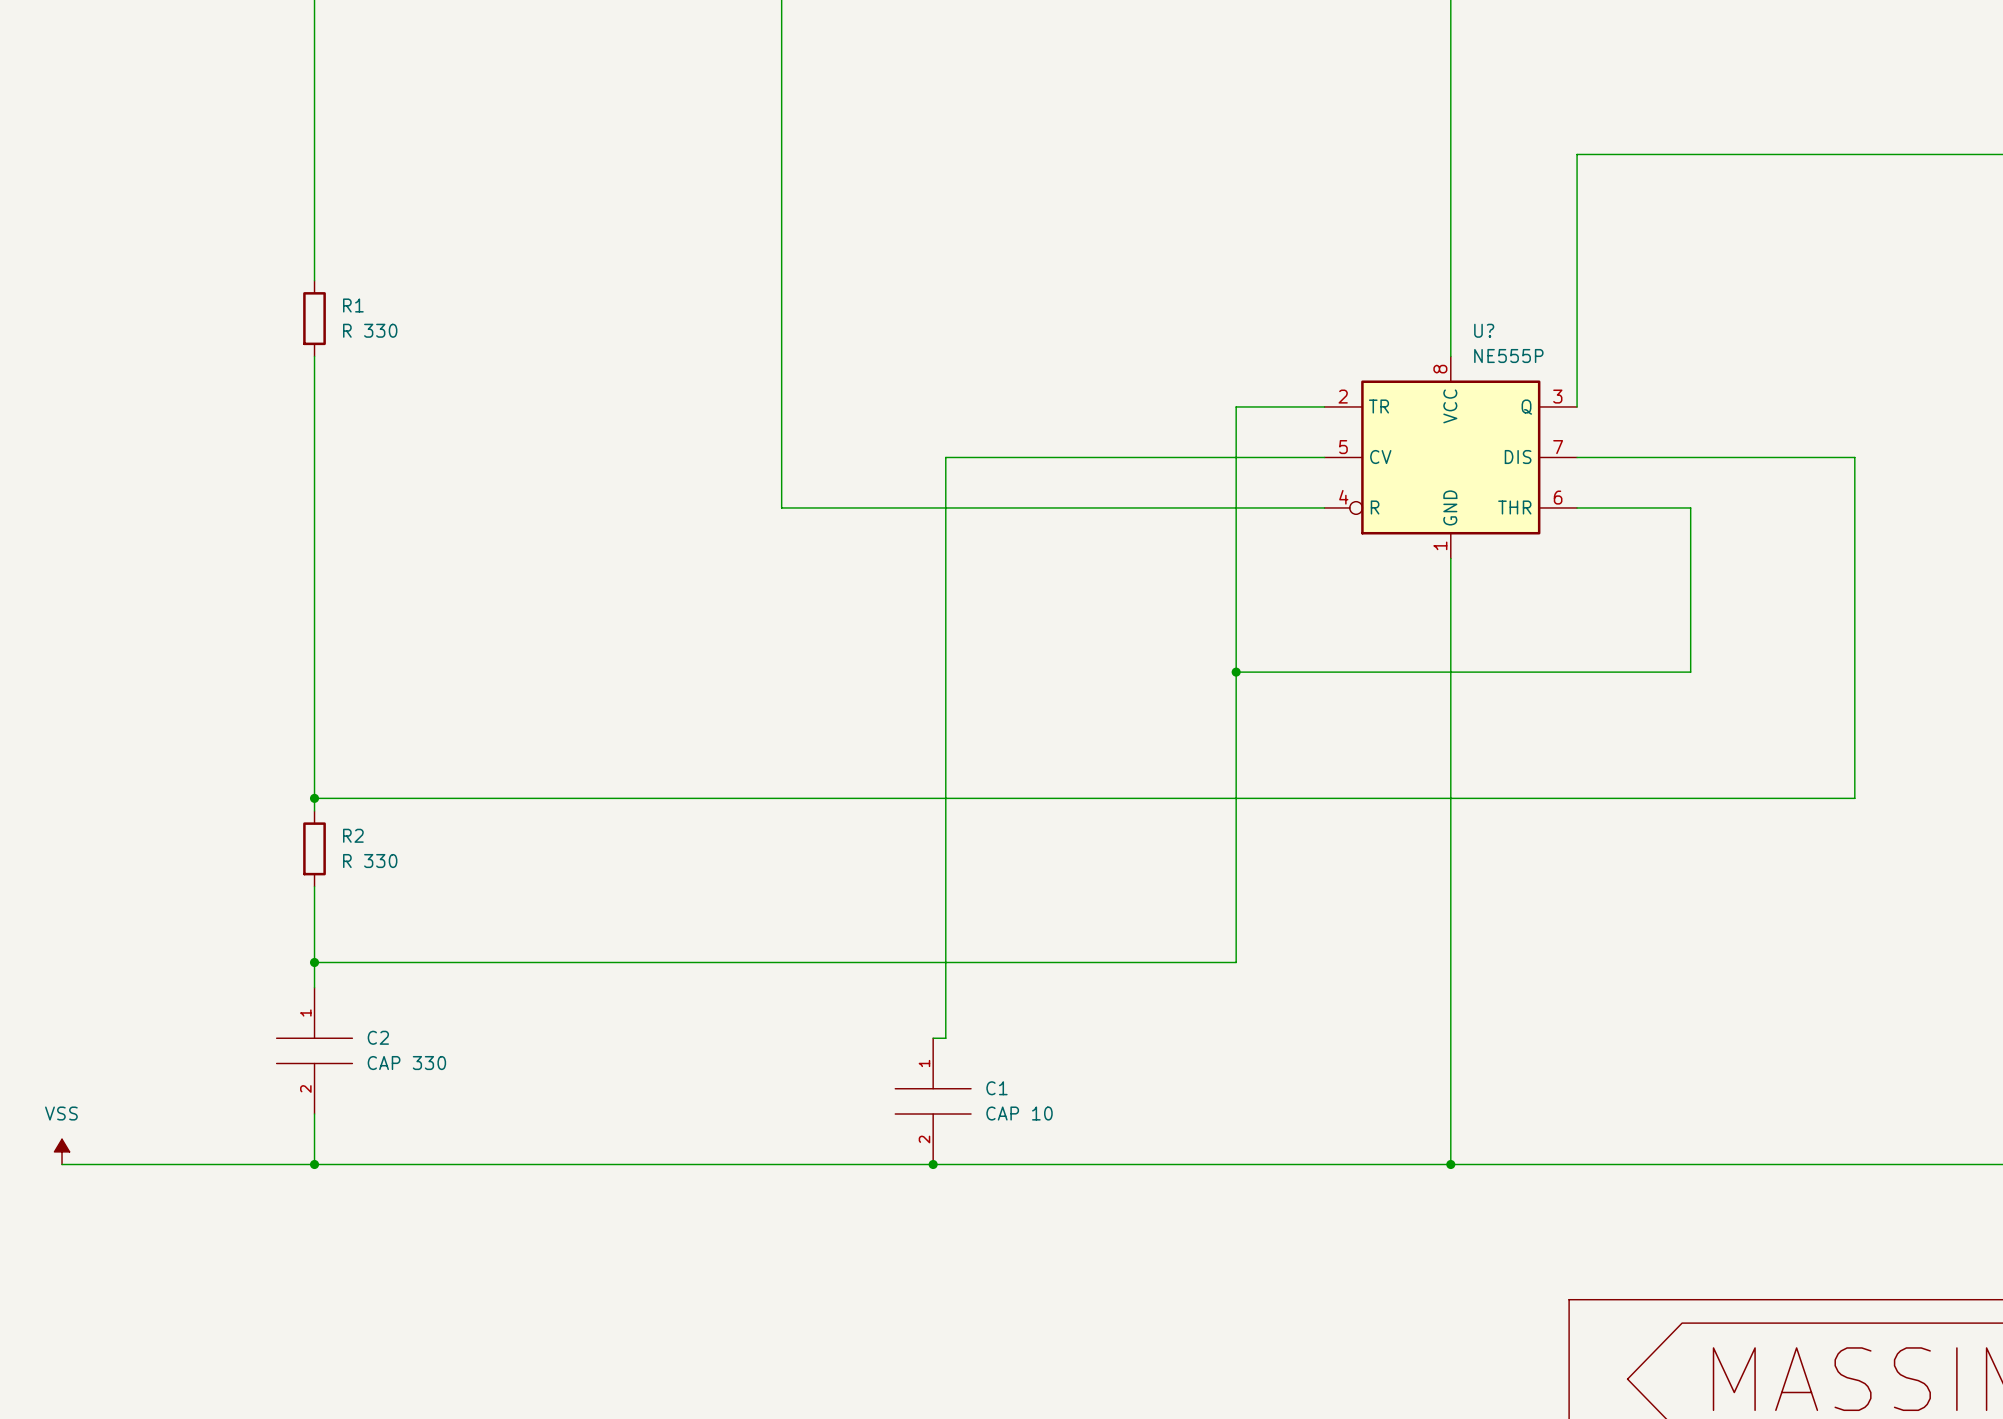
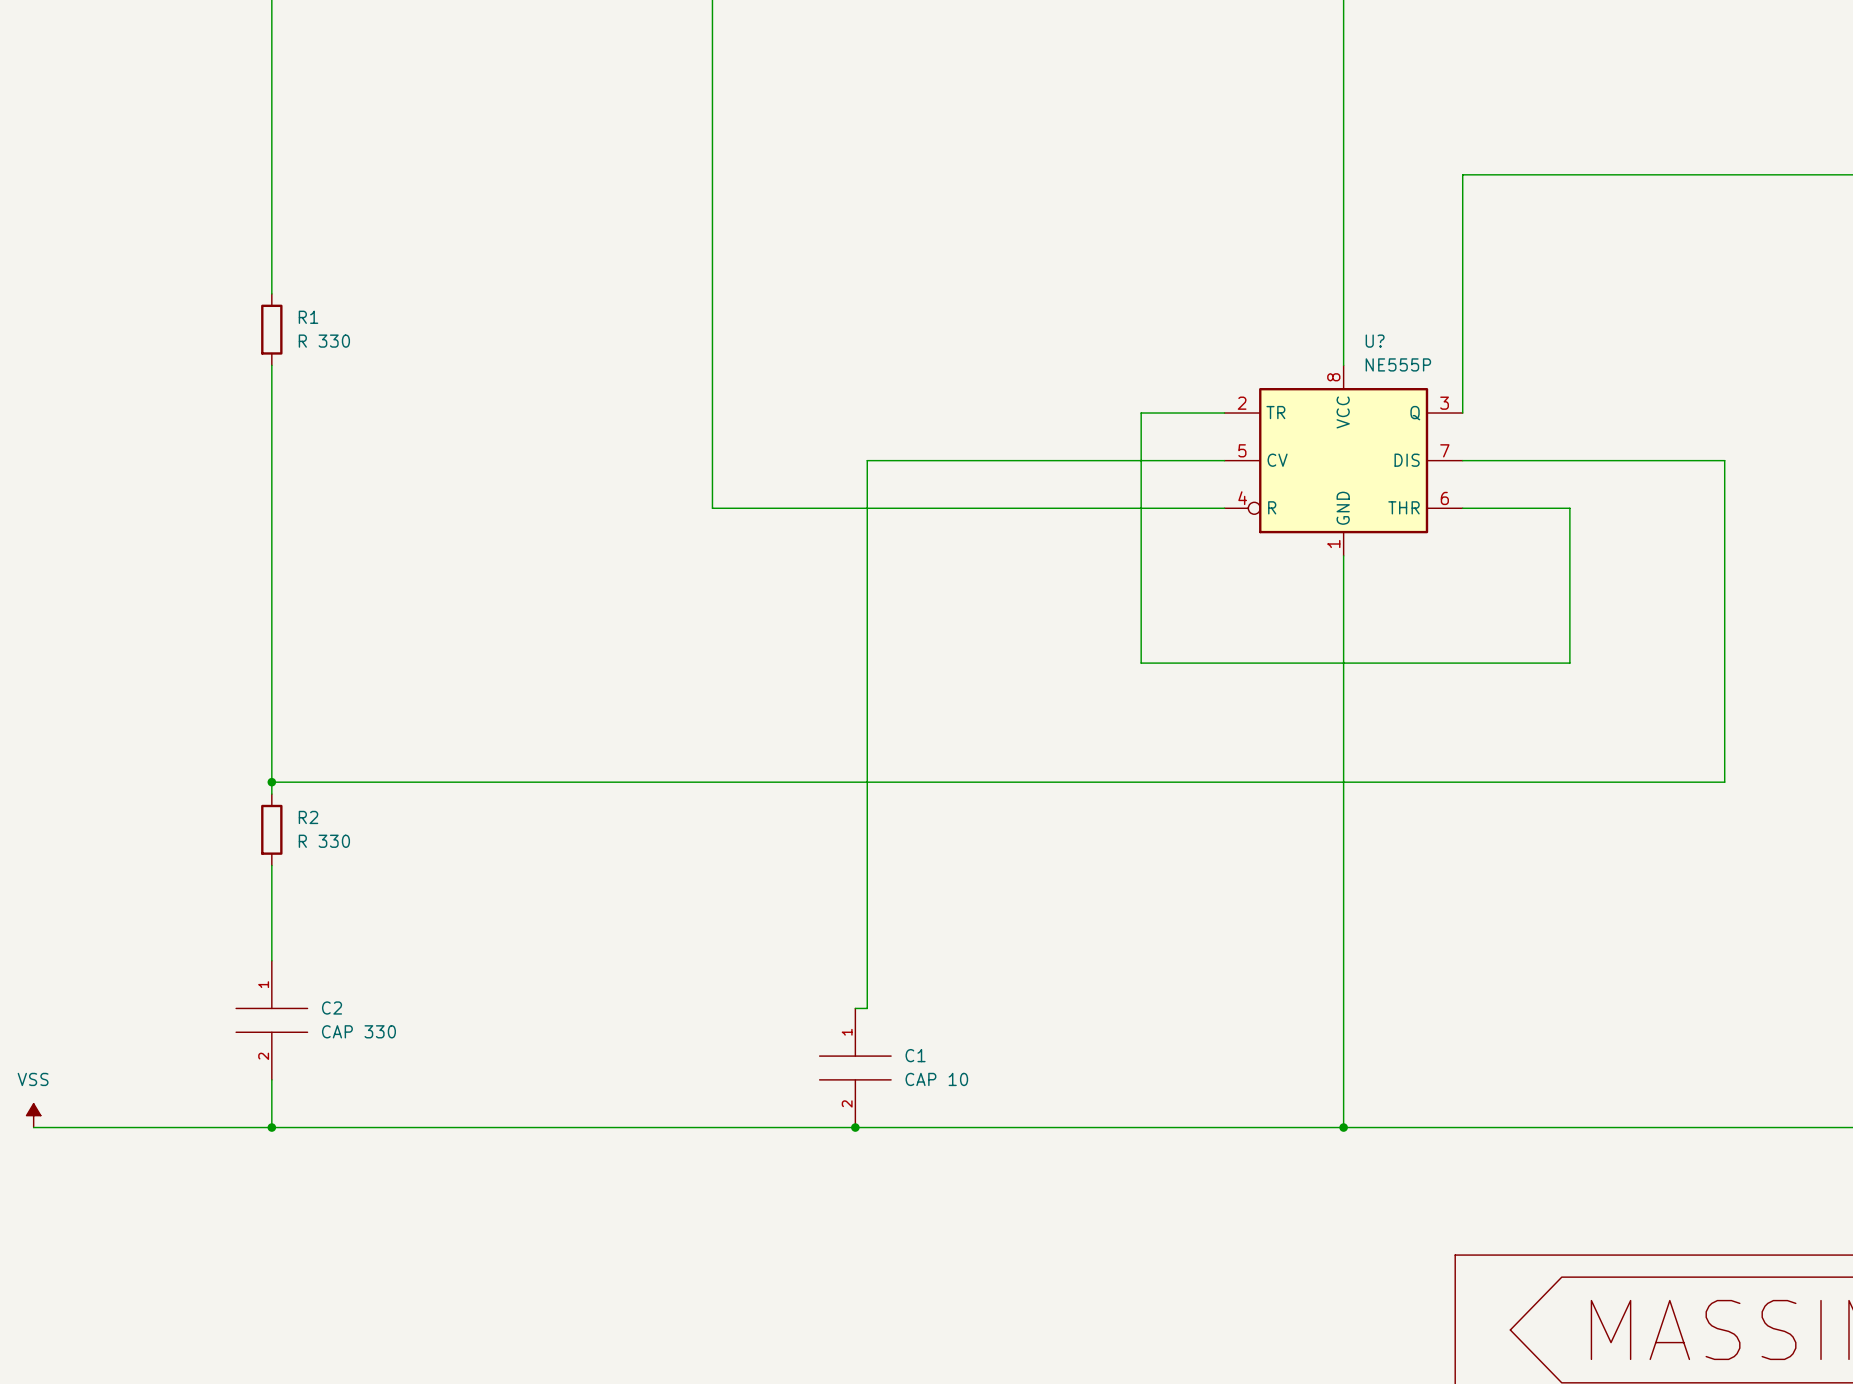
wire: (1236, 672) (1236, 962) (314, 962) -> none
junction: (1236, 672) -> none
junction: (314, 962) -> none

